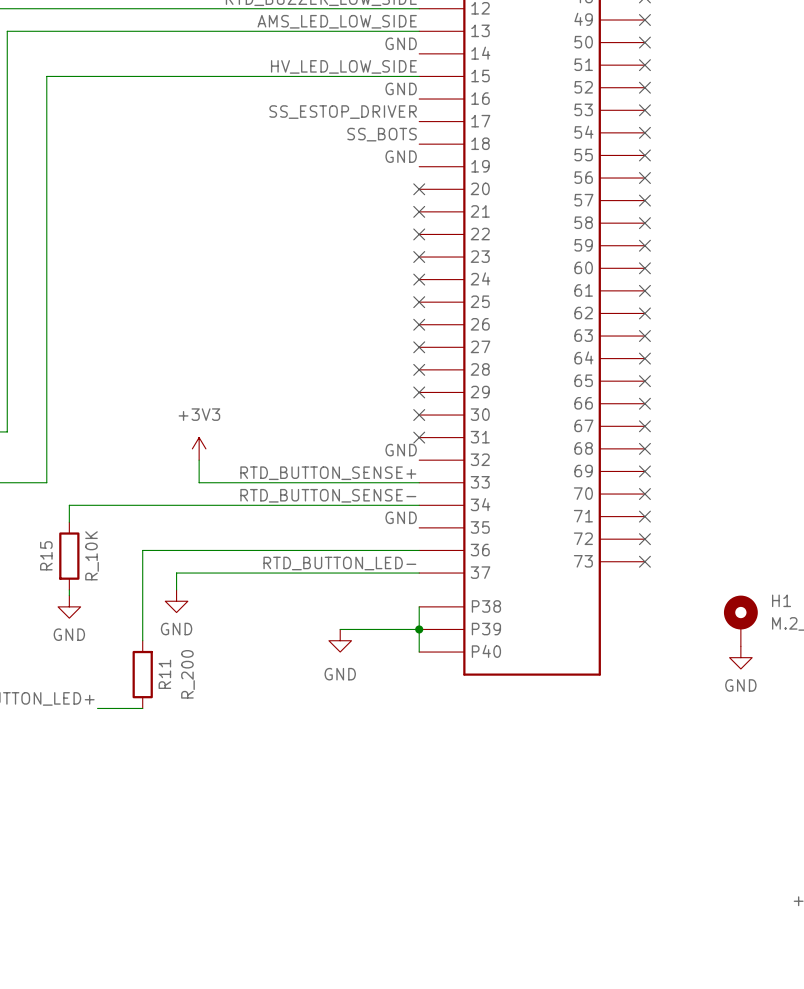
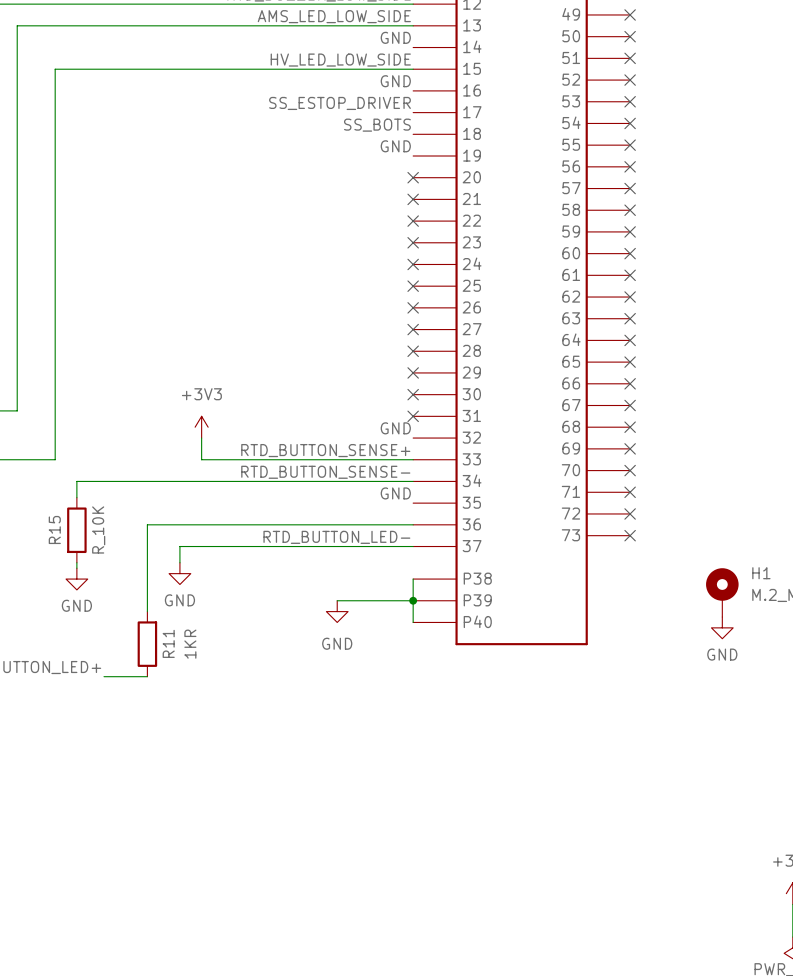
R11 value: R_200 (187, 674) -> 1KR (190, 644)

